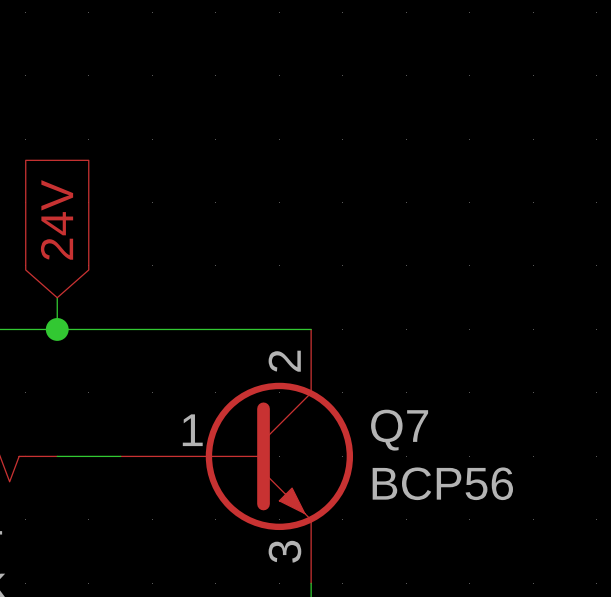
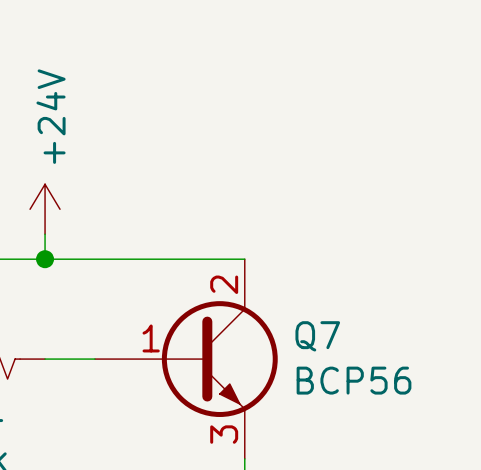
global label: 24V (57, 219) -> none
power symbol: none -> +24V (45, 209)

